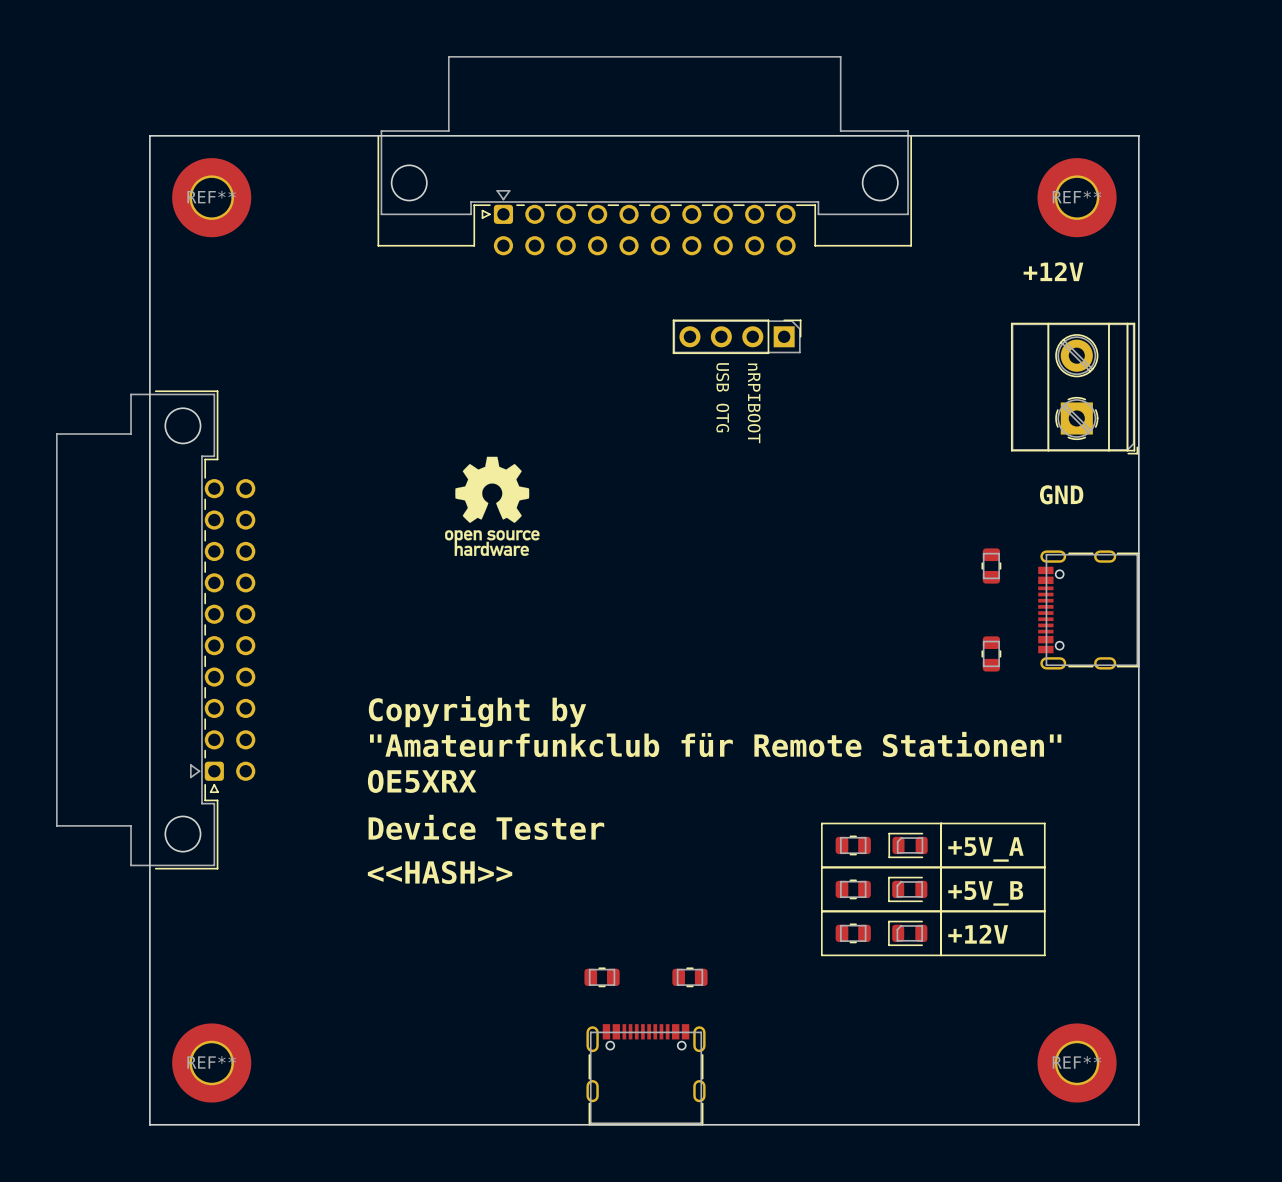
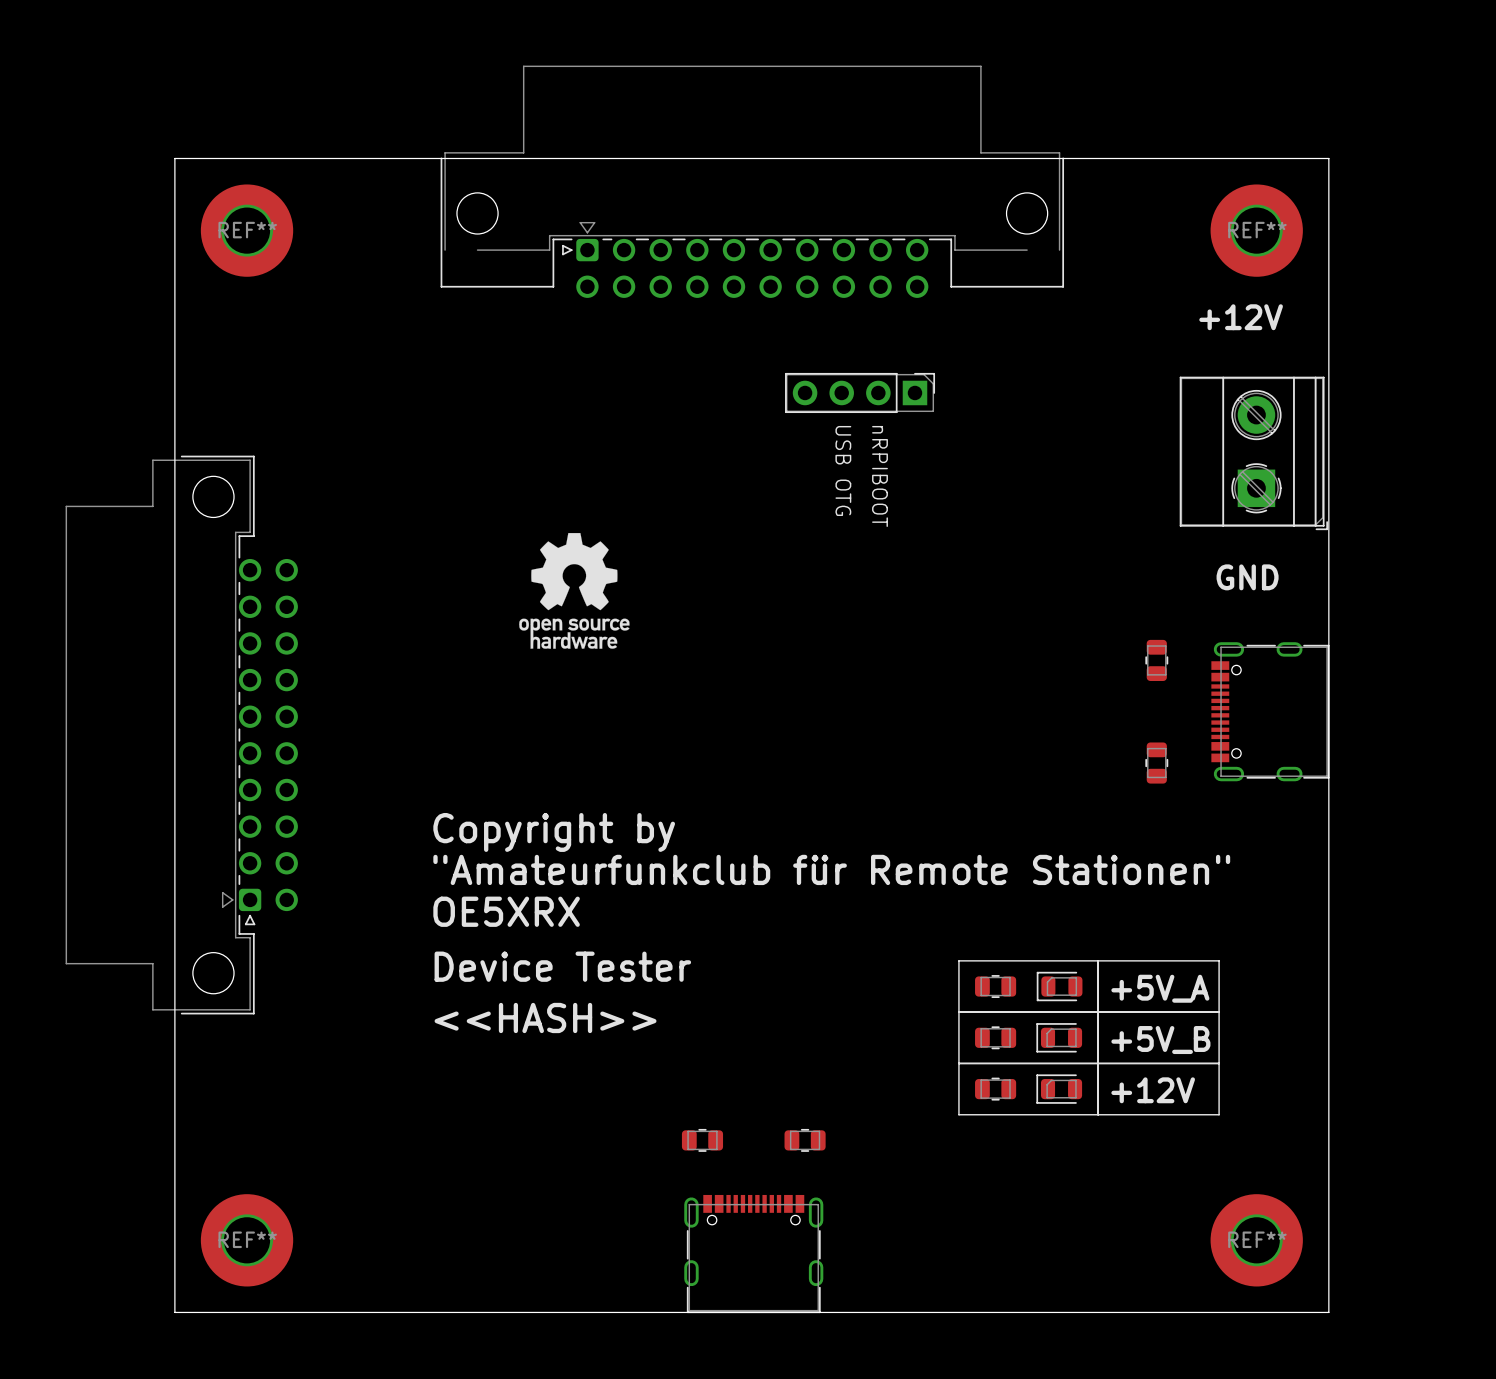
part footprint: [377, 56, 912, 256] -> [440, 65, 1065, 298]

